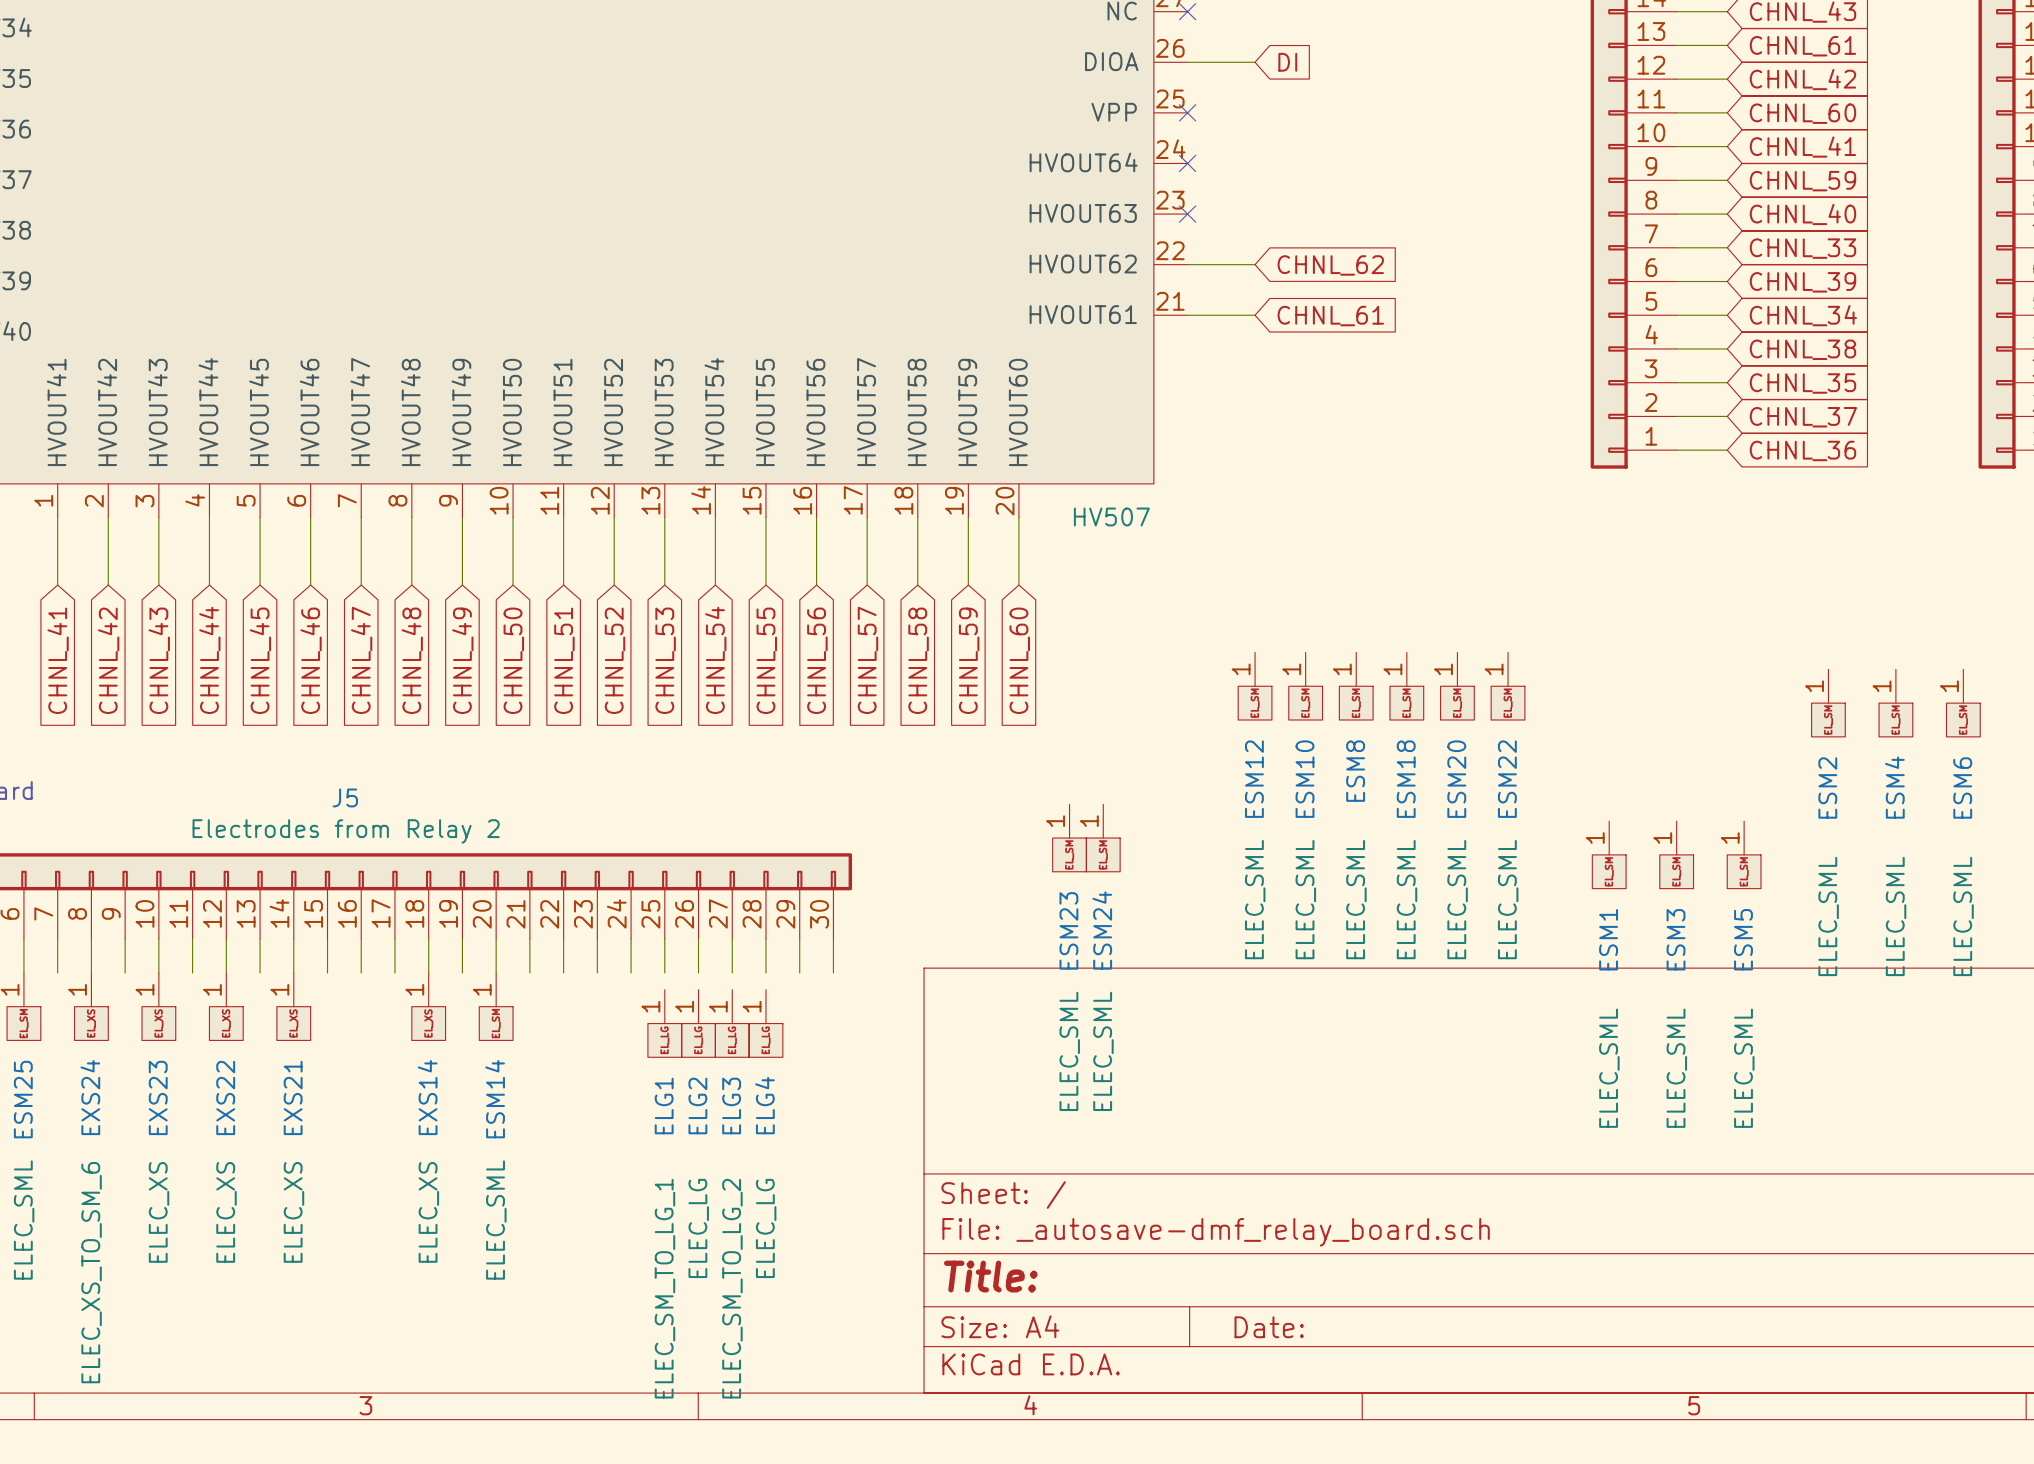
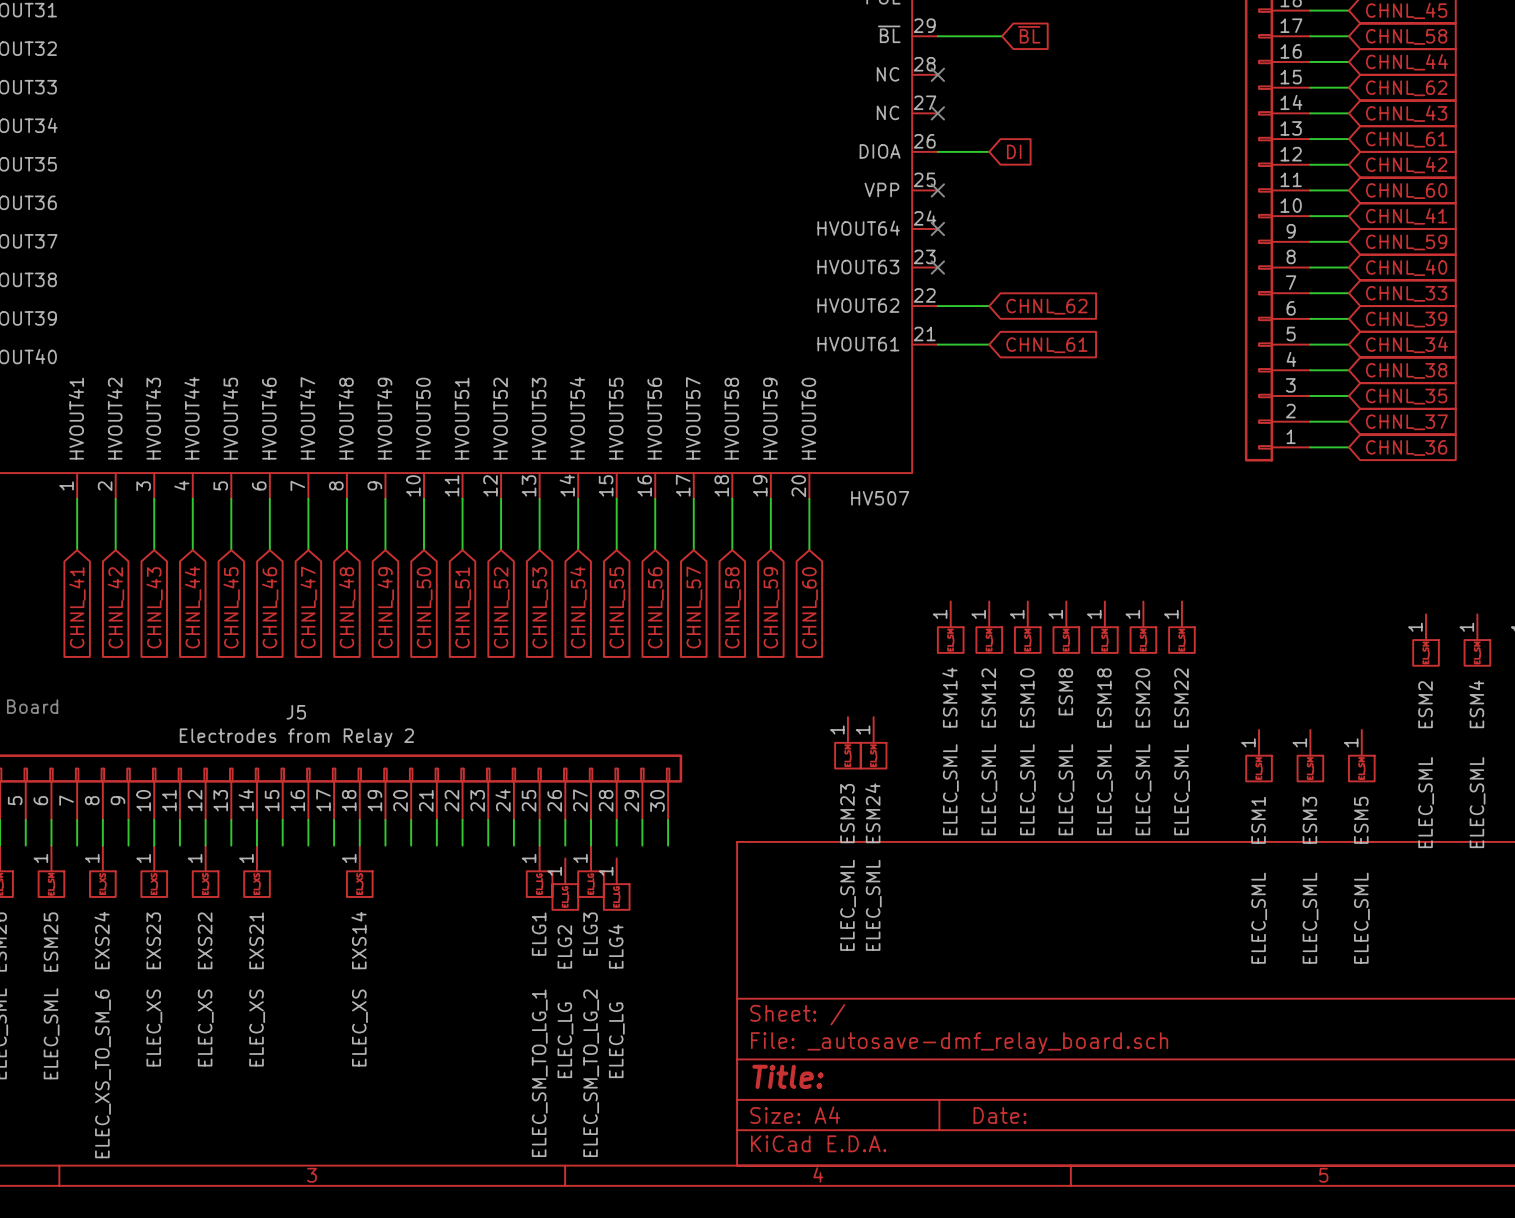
ESM14 position: (496, 1006) -> (950, 627)
ELG1 position: (664, 1023) -> (539, 871)
ELG3 position: (732, 1023) -> (591, 871)

